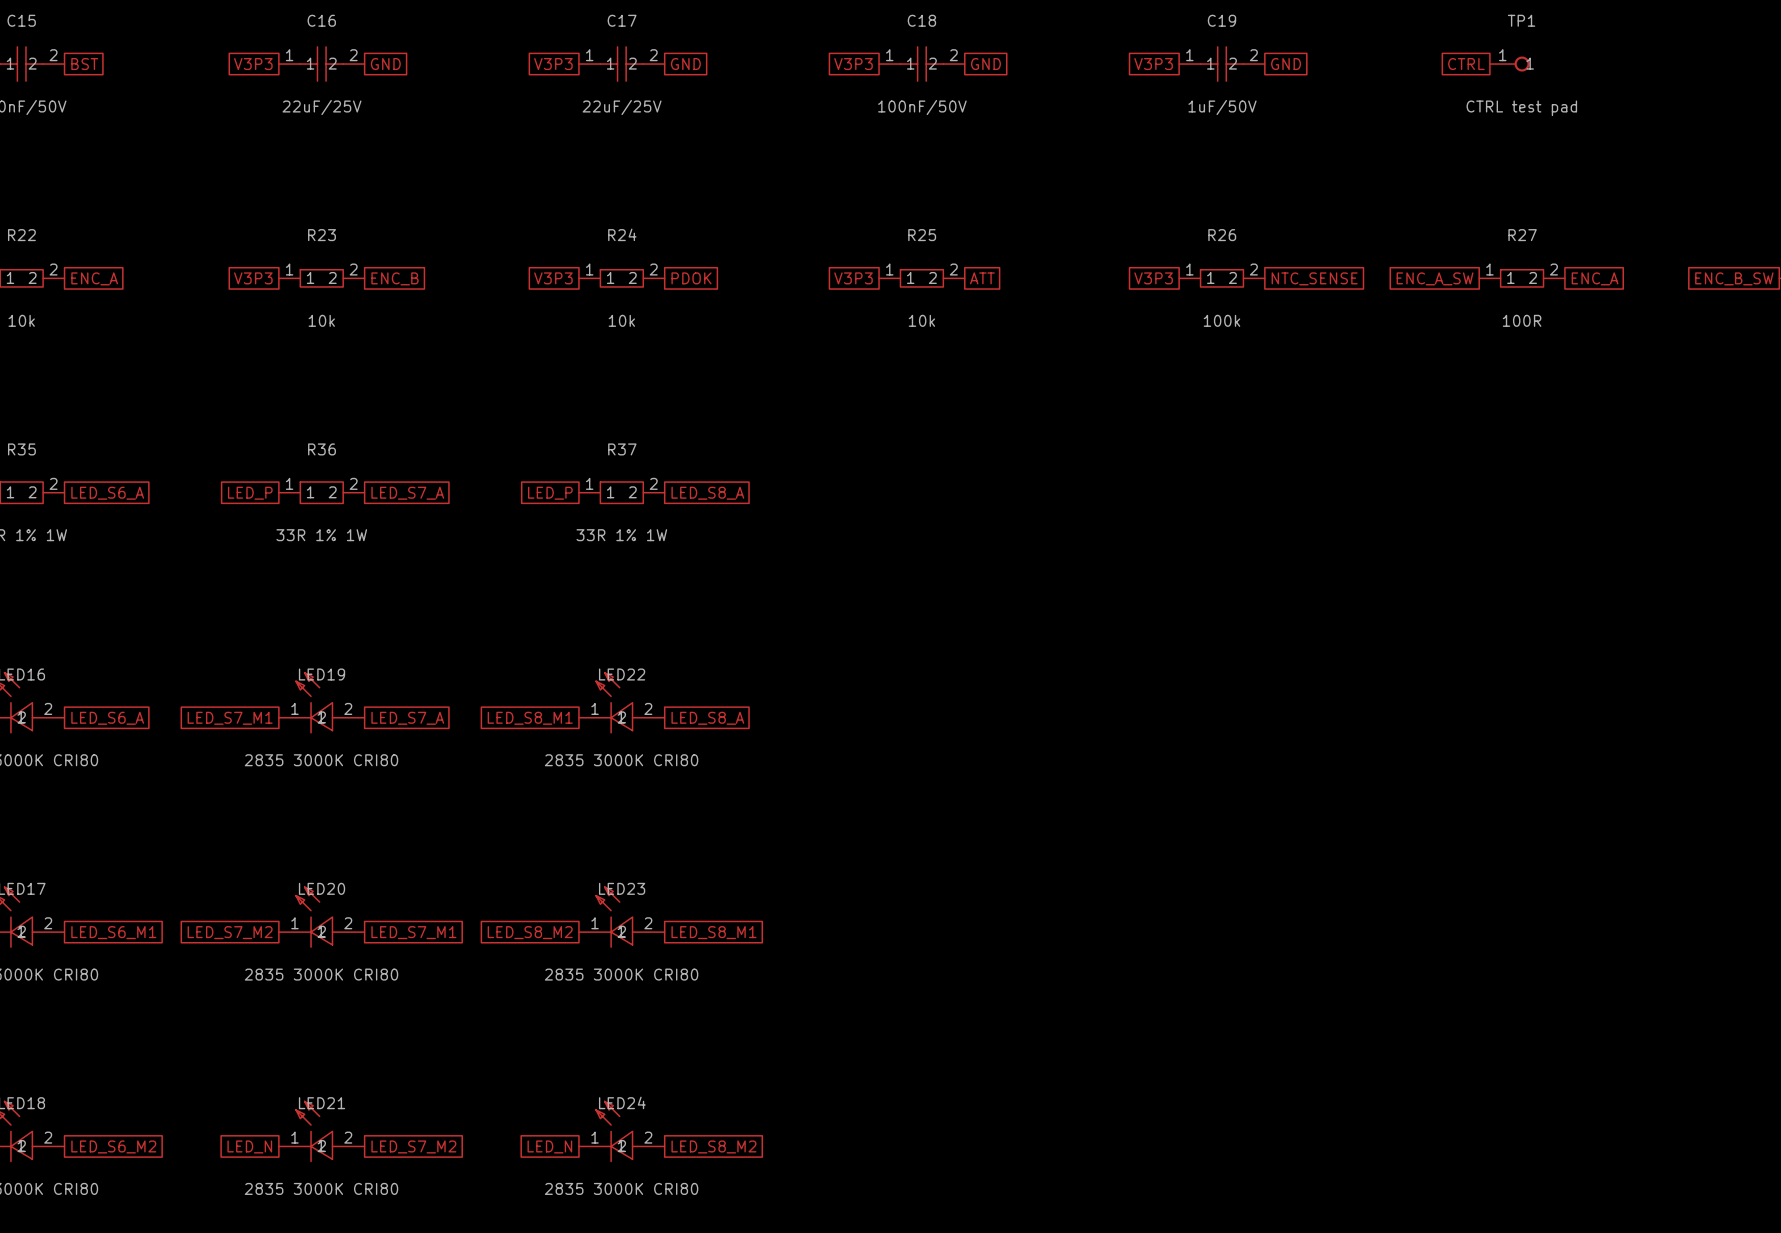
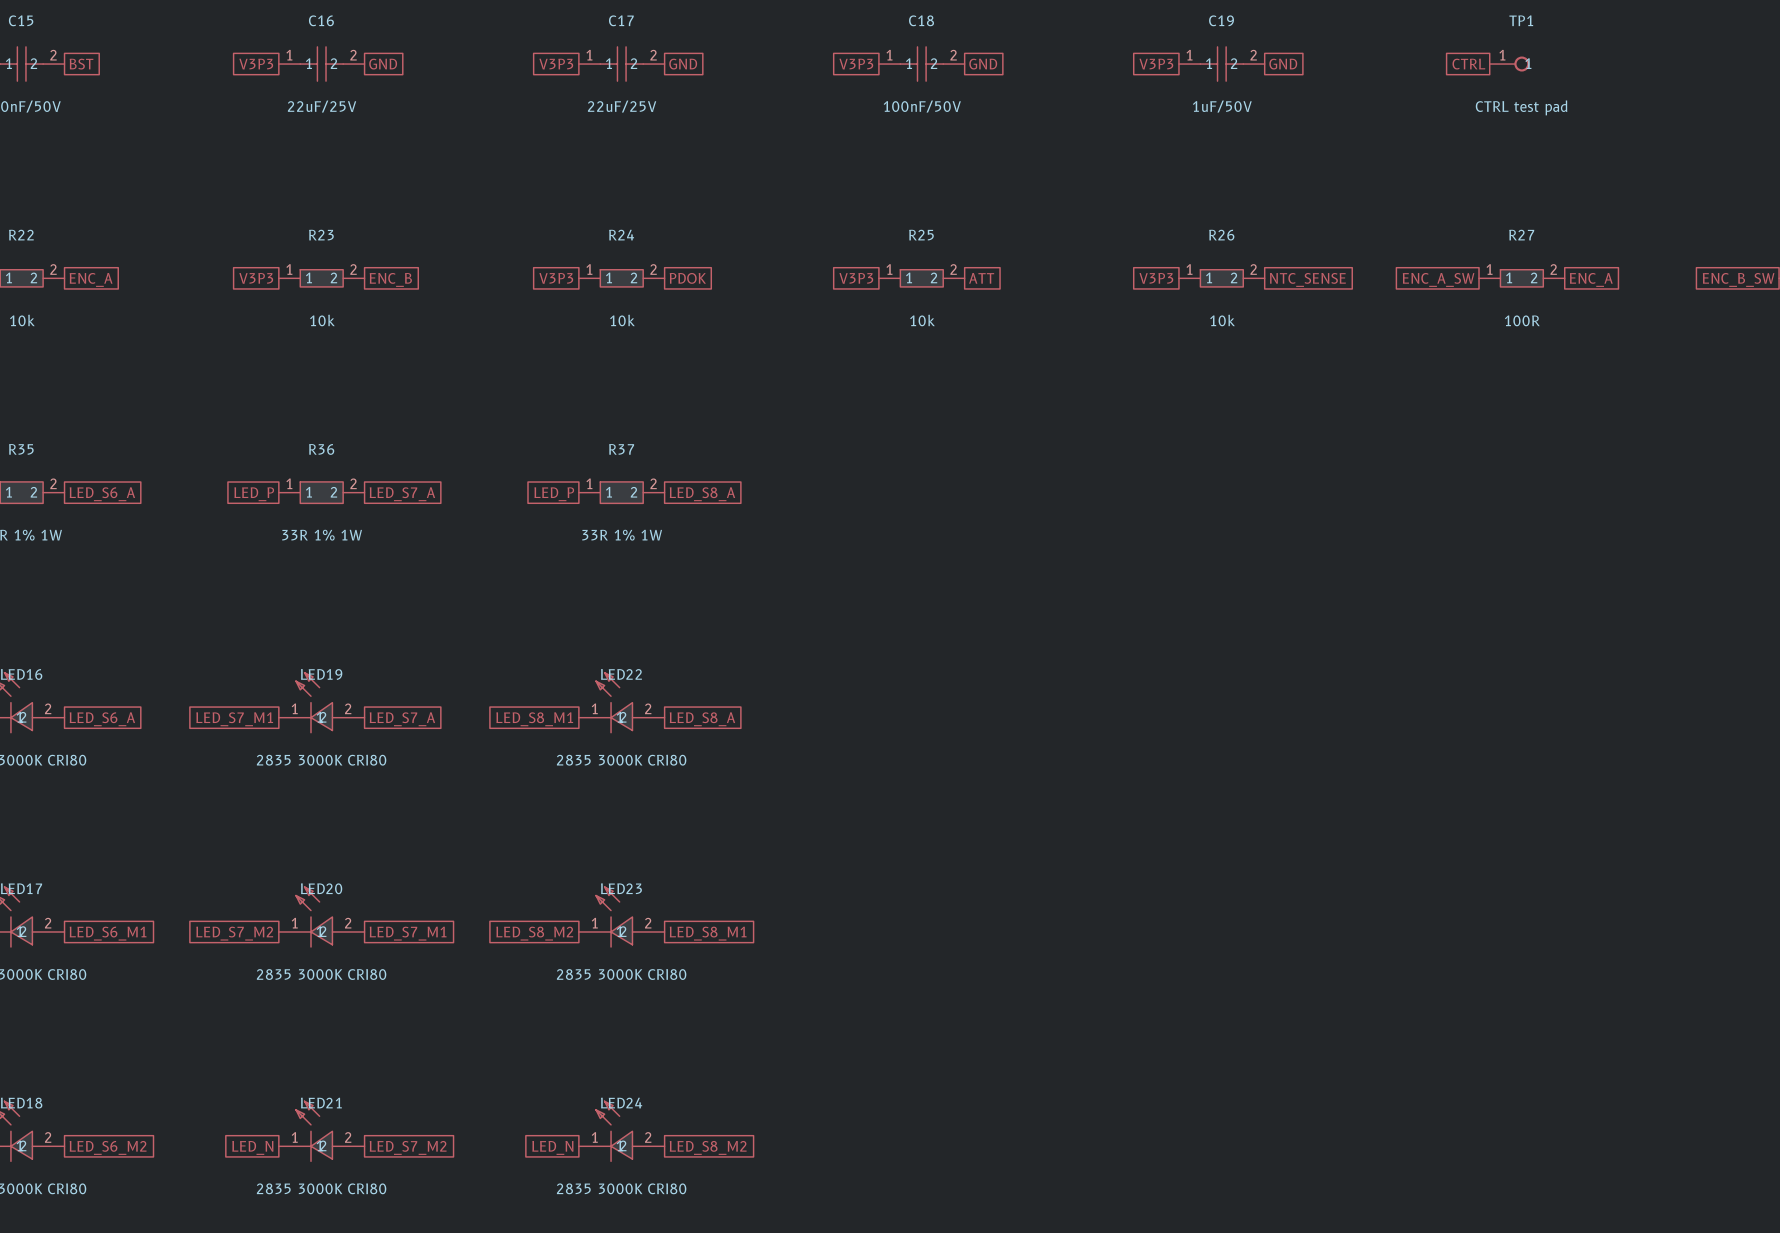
R26 value: 100k (1221, 320) -> 10k (1222, 320)

